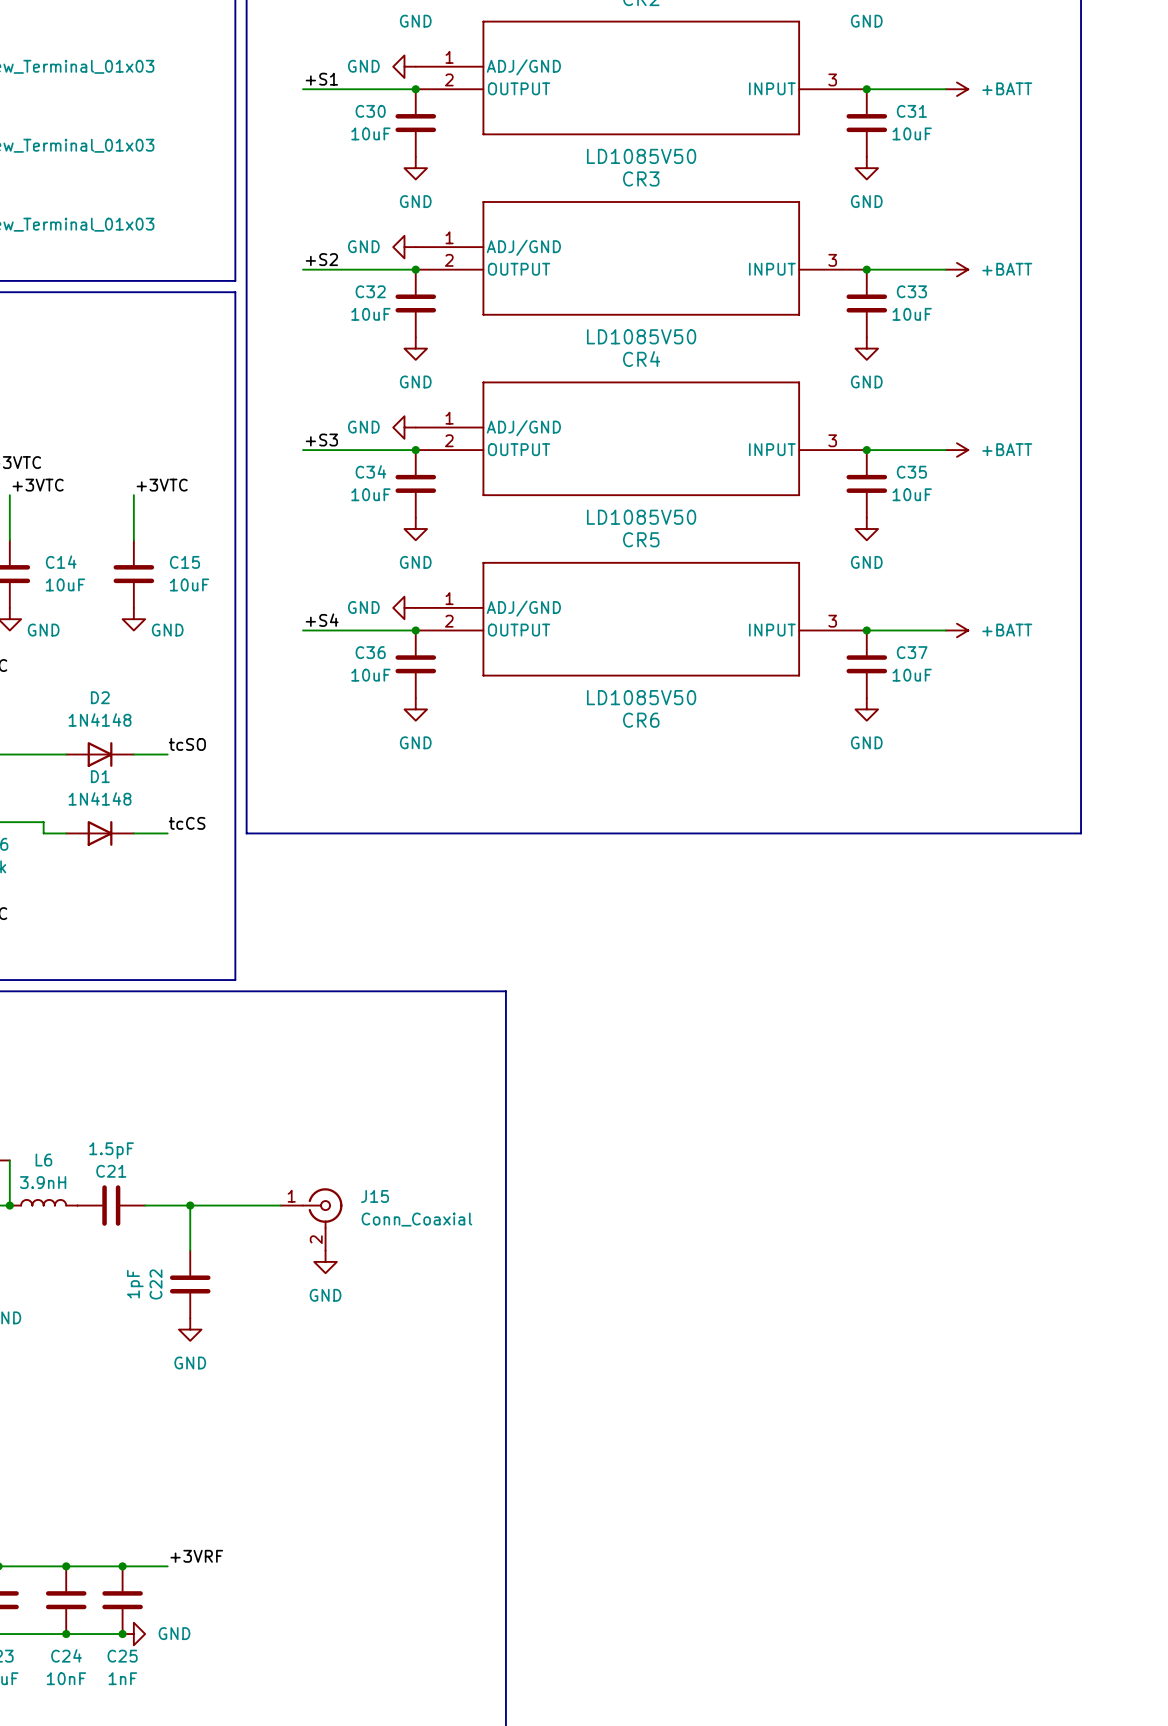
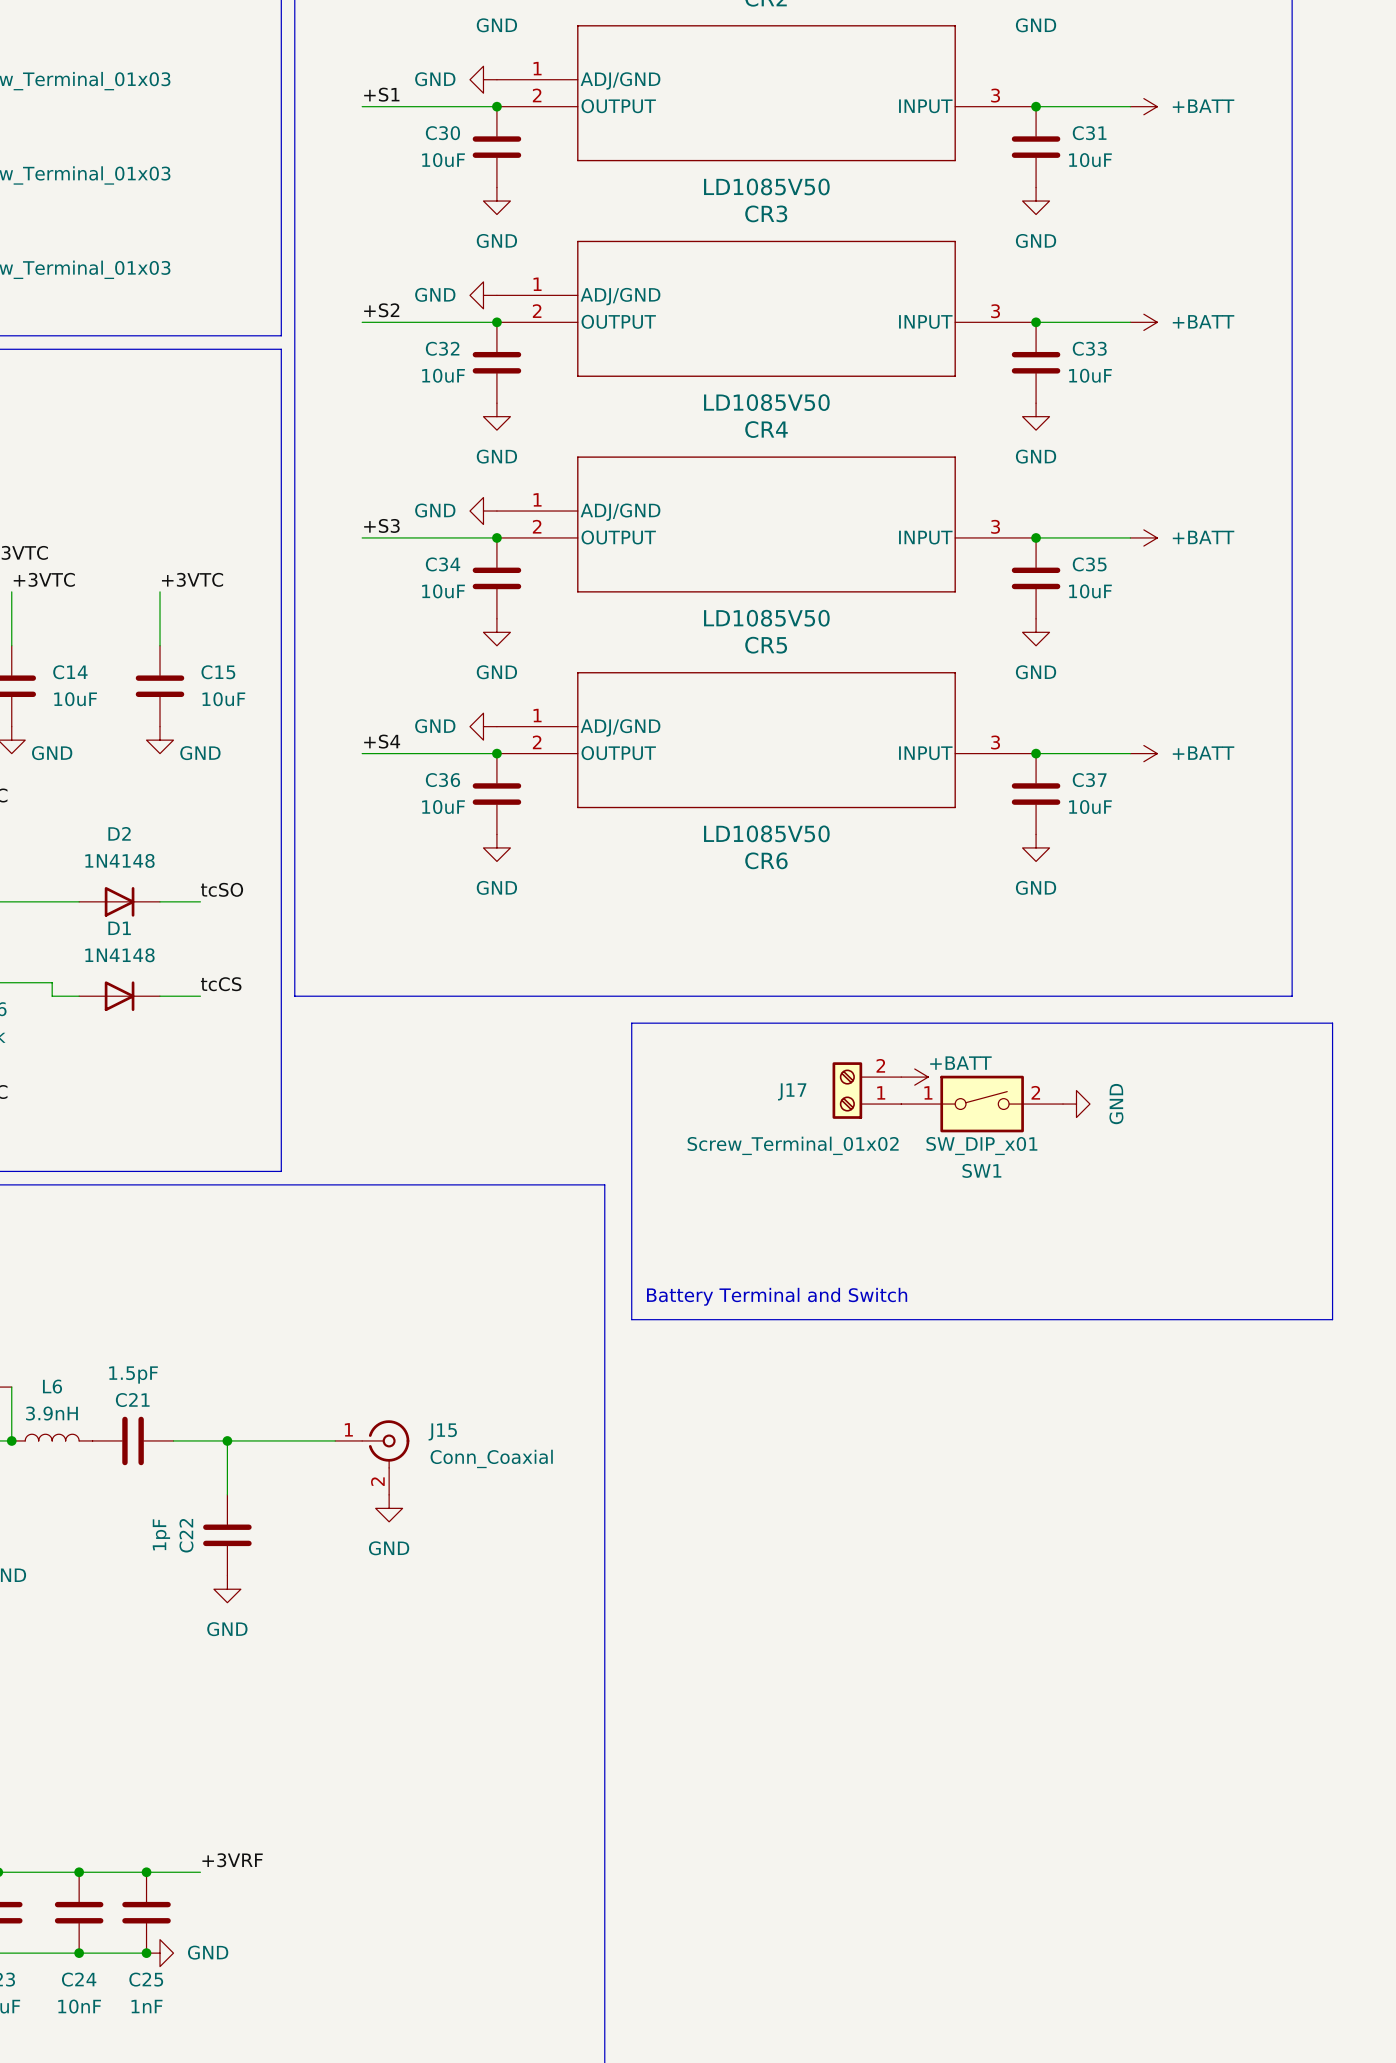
line: none -> (631, 1023) (1332, 1023) (1332, 1319) (631, 1319) (631, 1023)
power symbol: none -> +BATT (914, 1077)
J17: none -> Screw_Terminal_01x02 (866, 1090)
SW1: none -> SW_DIP_x01 (982, 1104)
power symbol: none -> GND (1076, 1104)
text: none -> Battery Terminal and Switch (777, 1296)

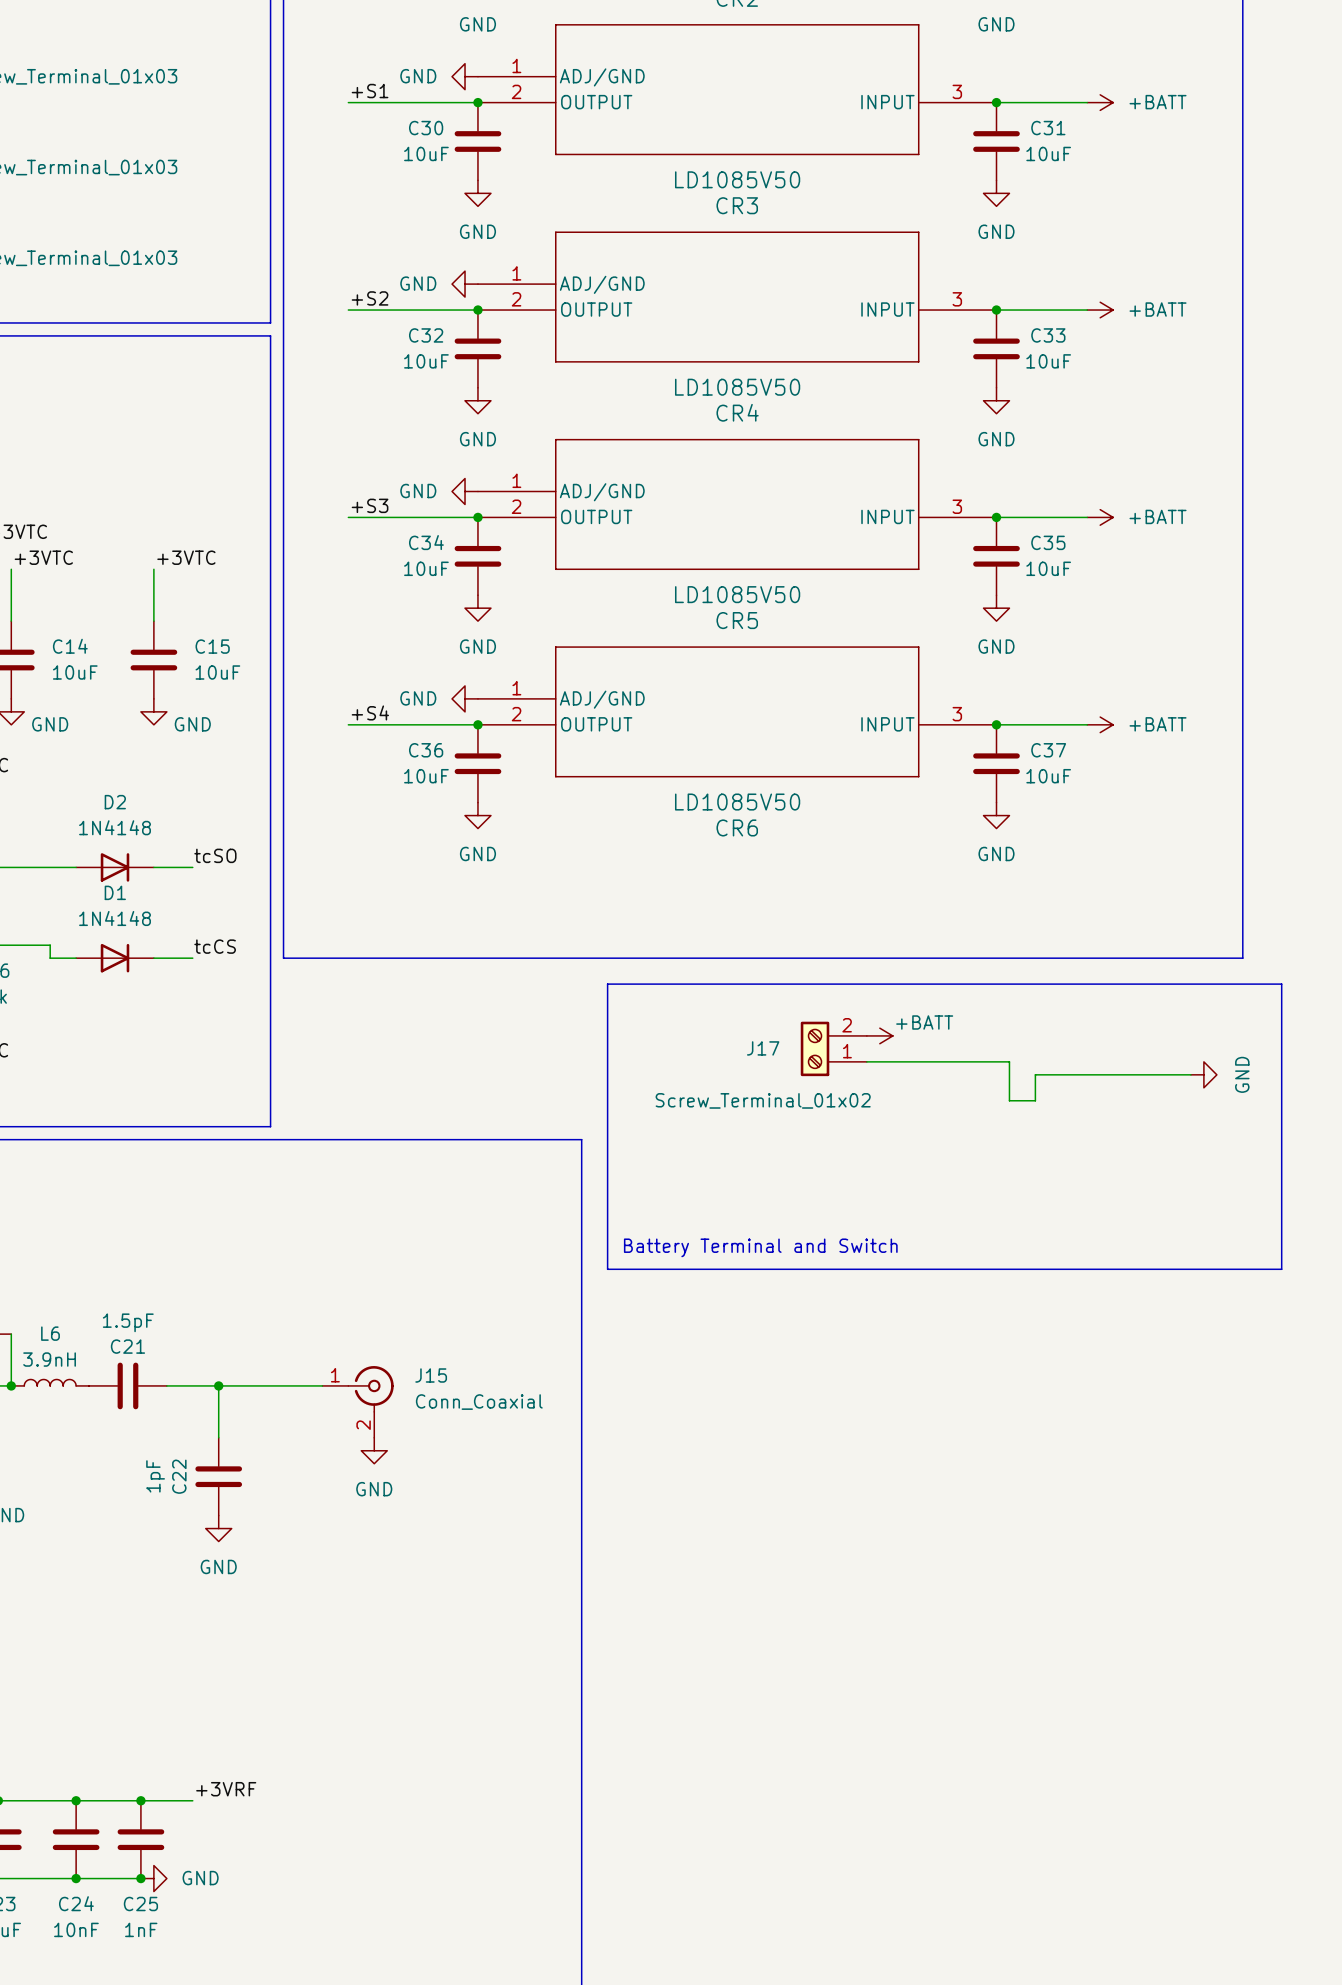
wire: none -> (866, 1061) (1009, 1061) (1009, 1100) (1035, 1100) (1035, 1074) (1190, 1074)
SW1: SW_DIP_x01 (982, 1104) -> none
power symbol position: GND (1076, 1104) -> GND (1203, 1074)

